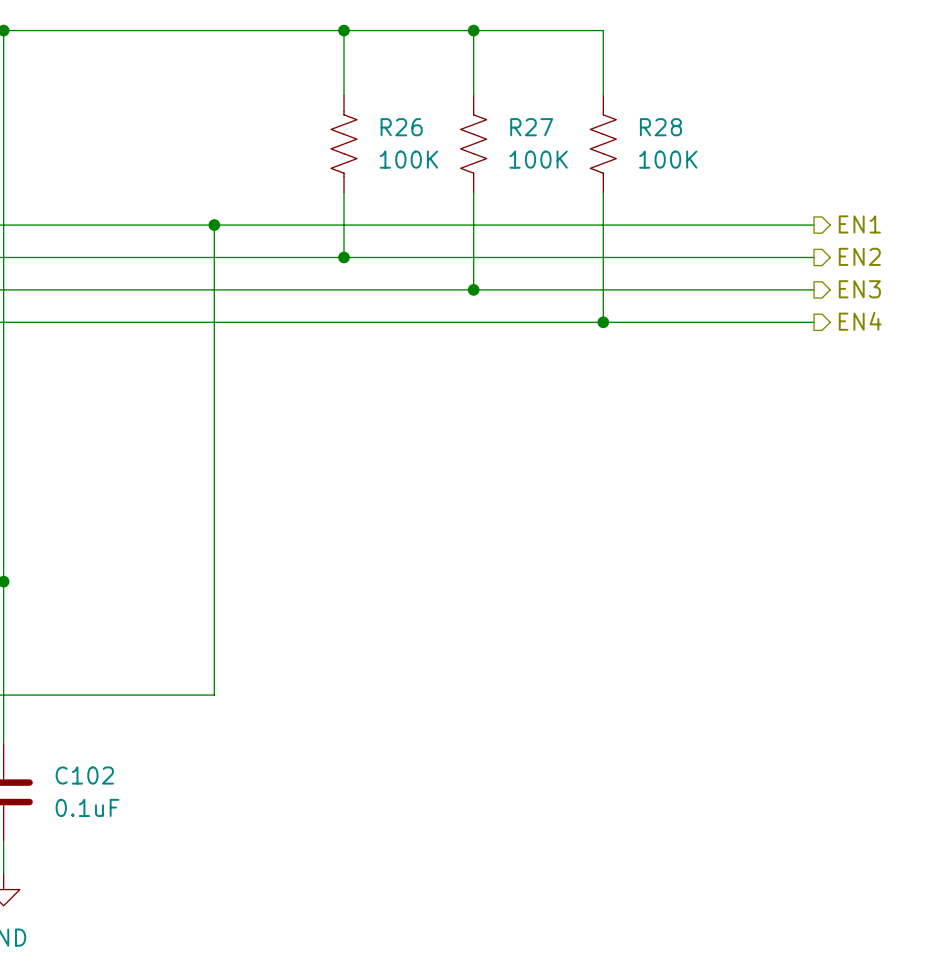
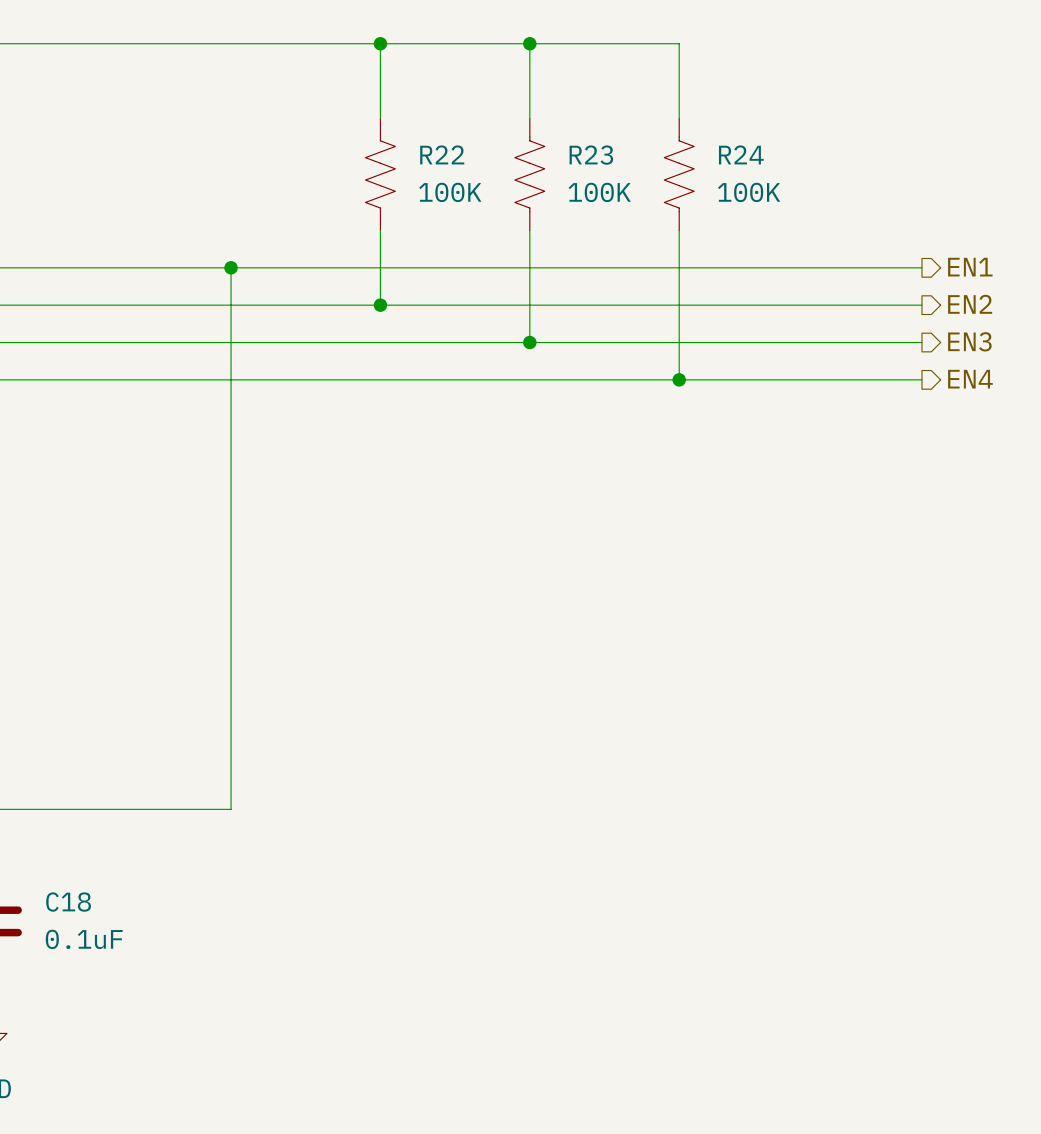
R26 name: R26 (401, 127) -> R22 (442, 154)
R27 name: R27 (531, 127) -> R23 (591, 155)
R28 name: R28 (660, 127) -> R24 (741, 154)
C102 name: C102 (84, 775) -> C18 (68, 902)

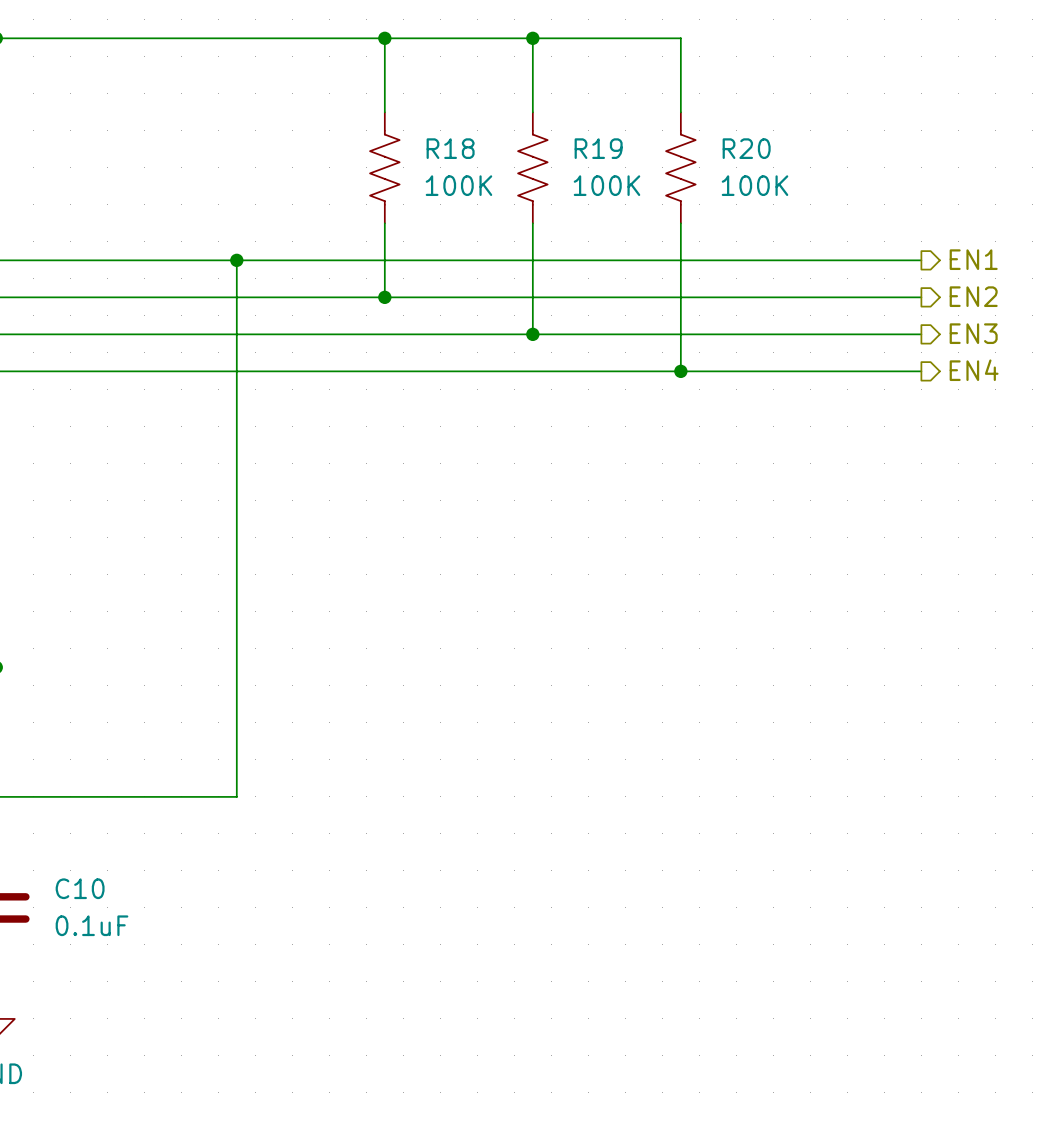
R22 name: R22 (442, 154) -> R18 (450, 148)
R24 name: R24 (741, 154) -> R20 (746, 148)
R23 name: R23 (591, 155) -> R19 (598, 148)
C18 name: C18 (68, 902) -> C10 (80, 888)

